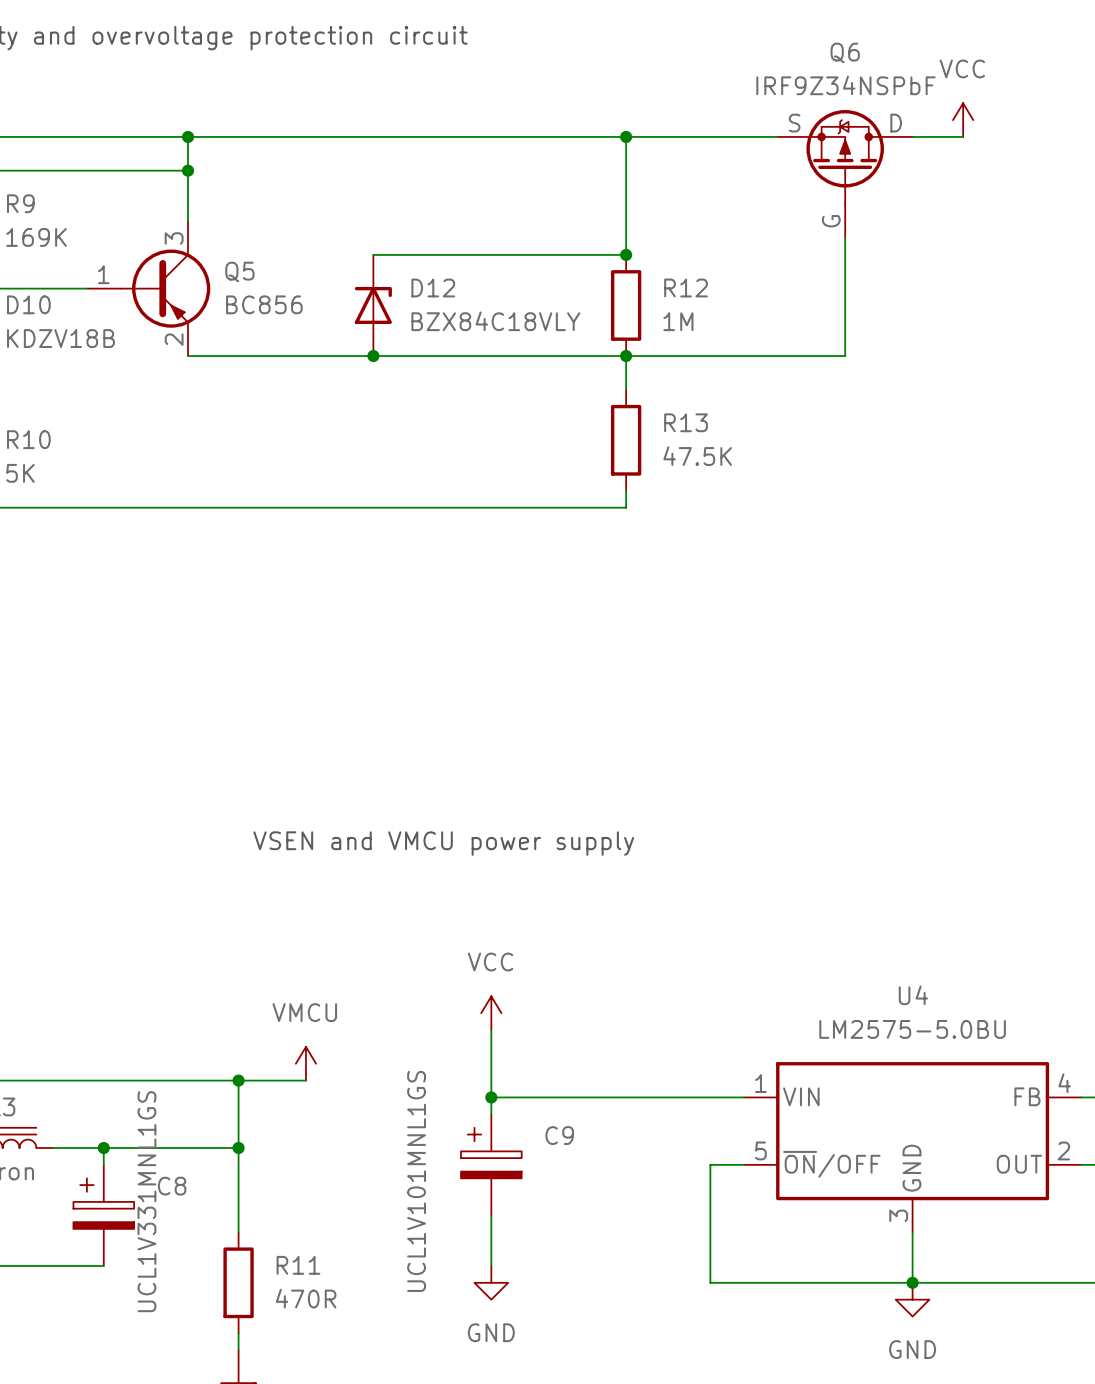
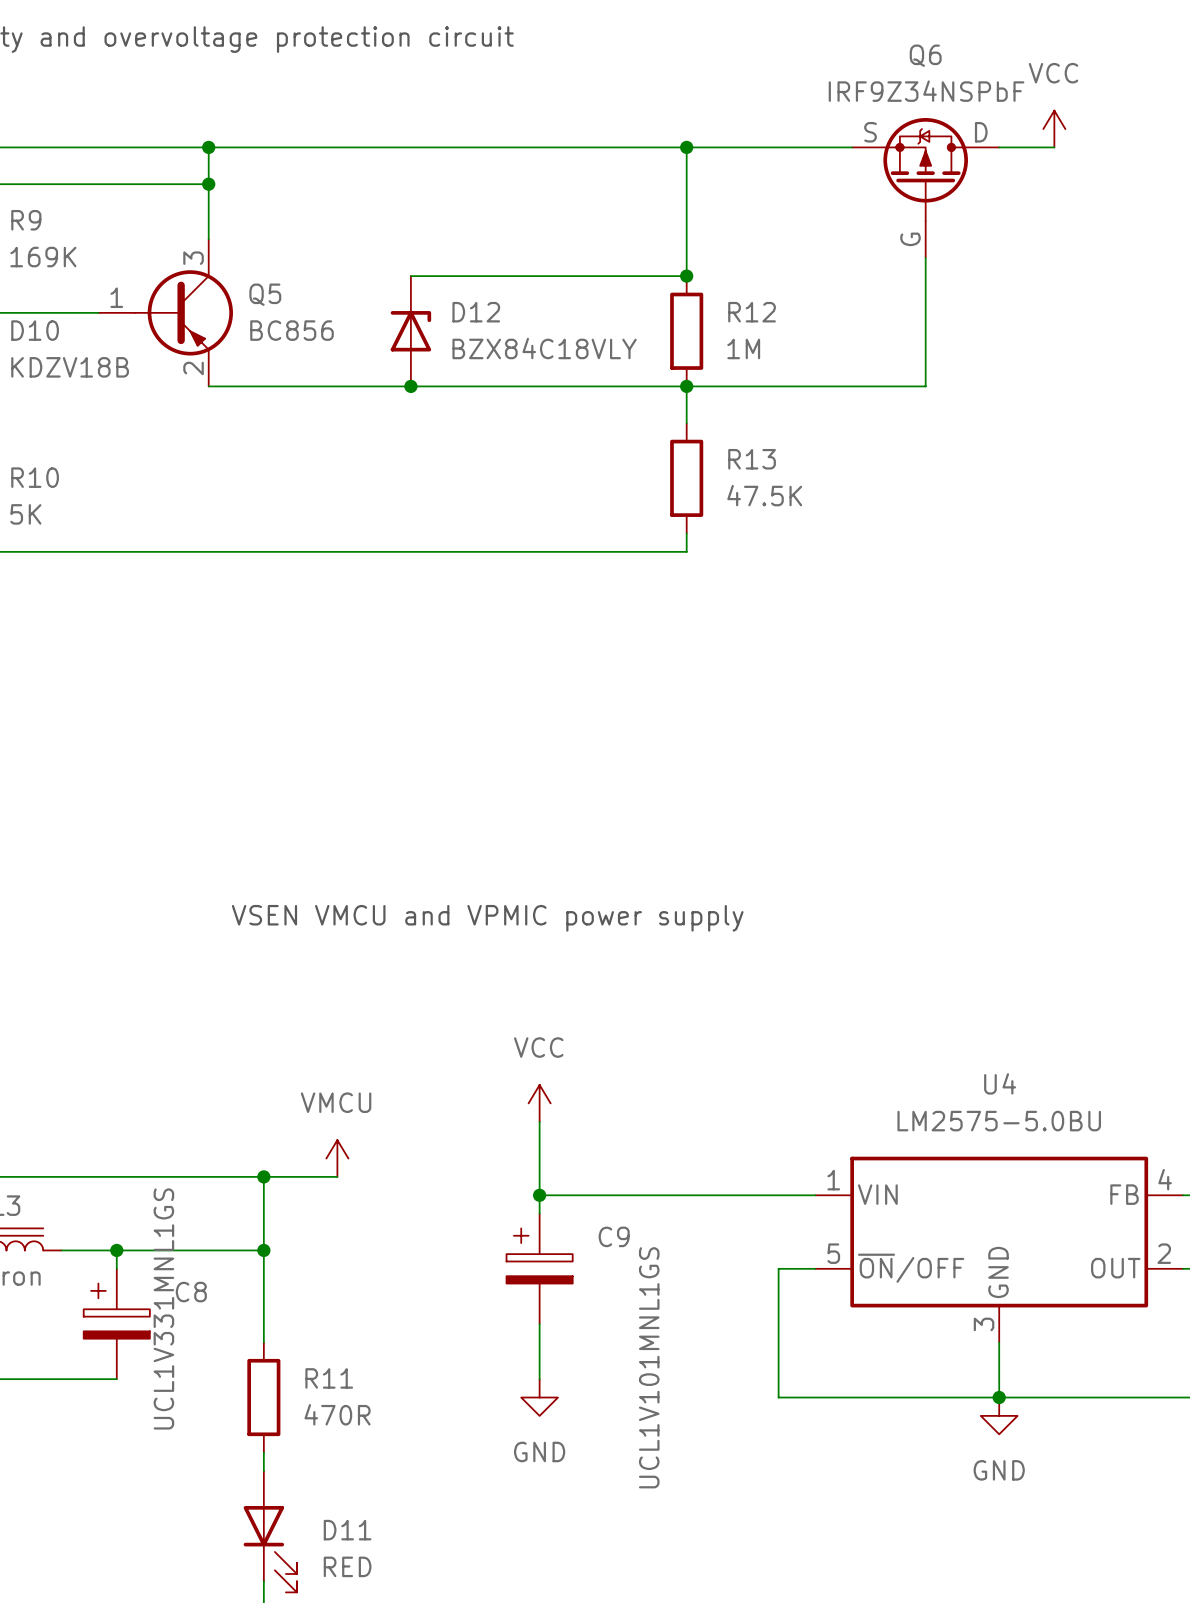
text: VSEN and VMCU power supply (443, 843) -> VSEN VMCU and VPMIC power supply (487, 918)
C9 value position: UCL1V101MNL1GS (416, 1181) -> UCL1V101MNL1GS (649, 1367)

